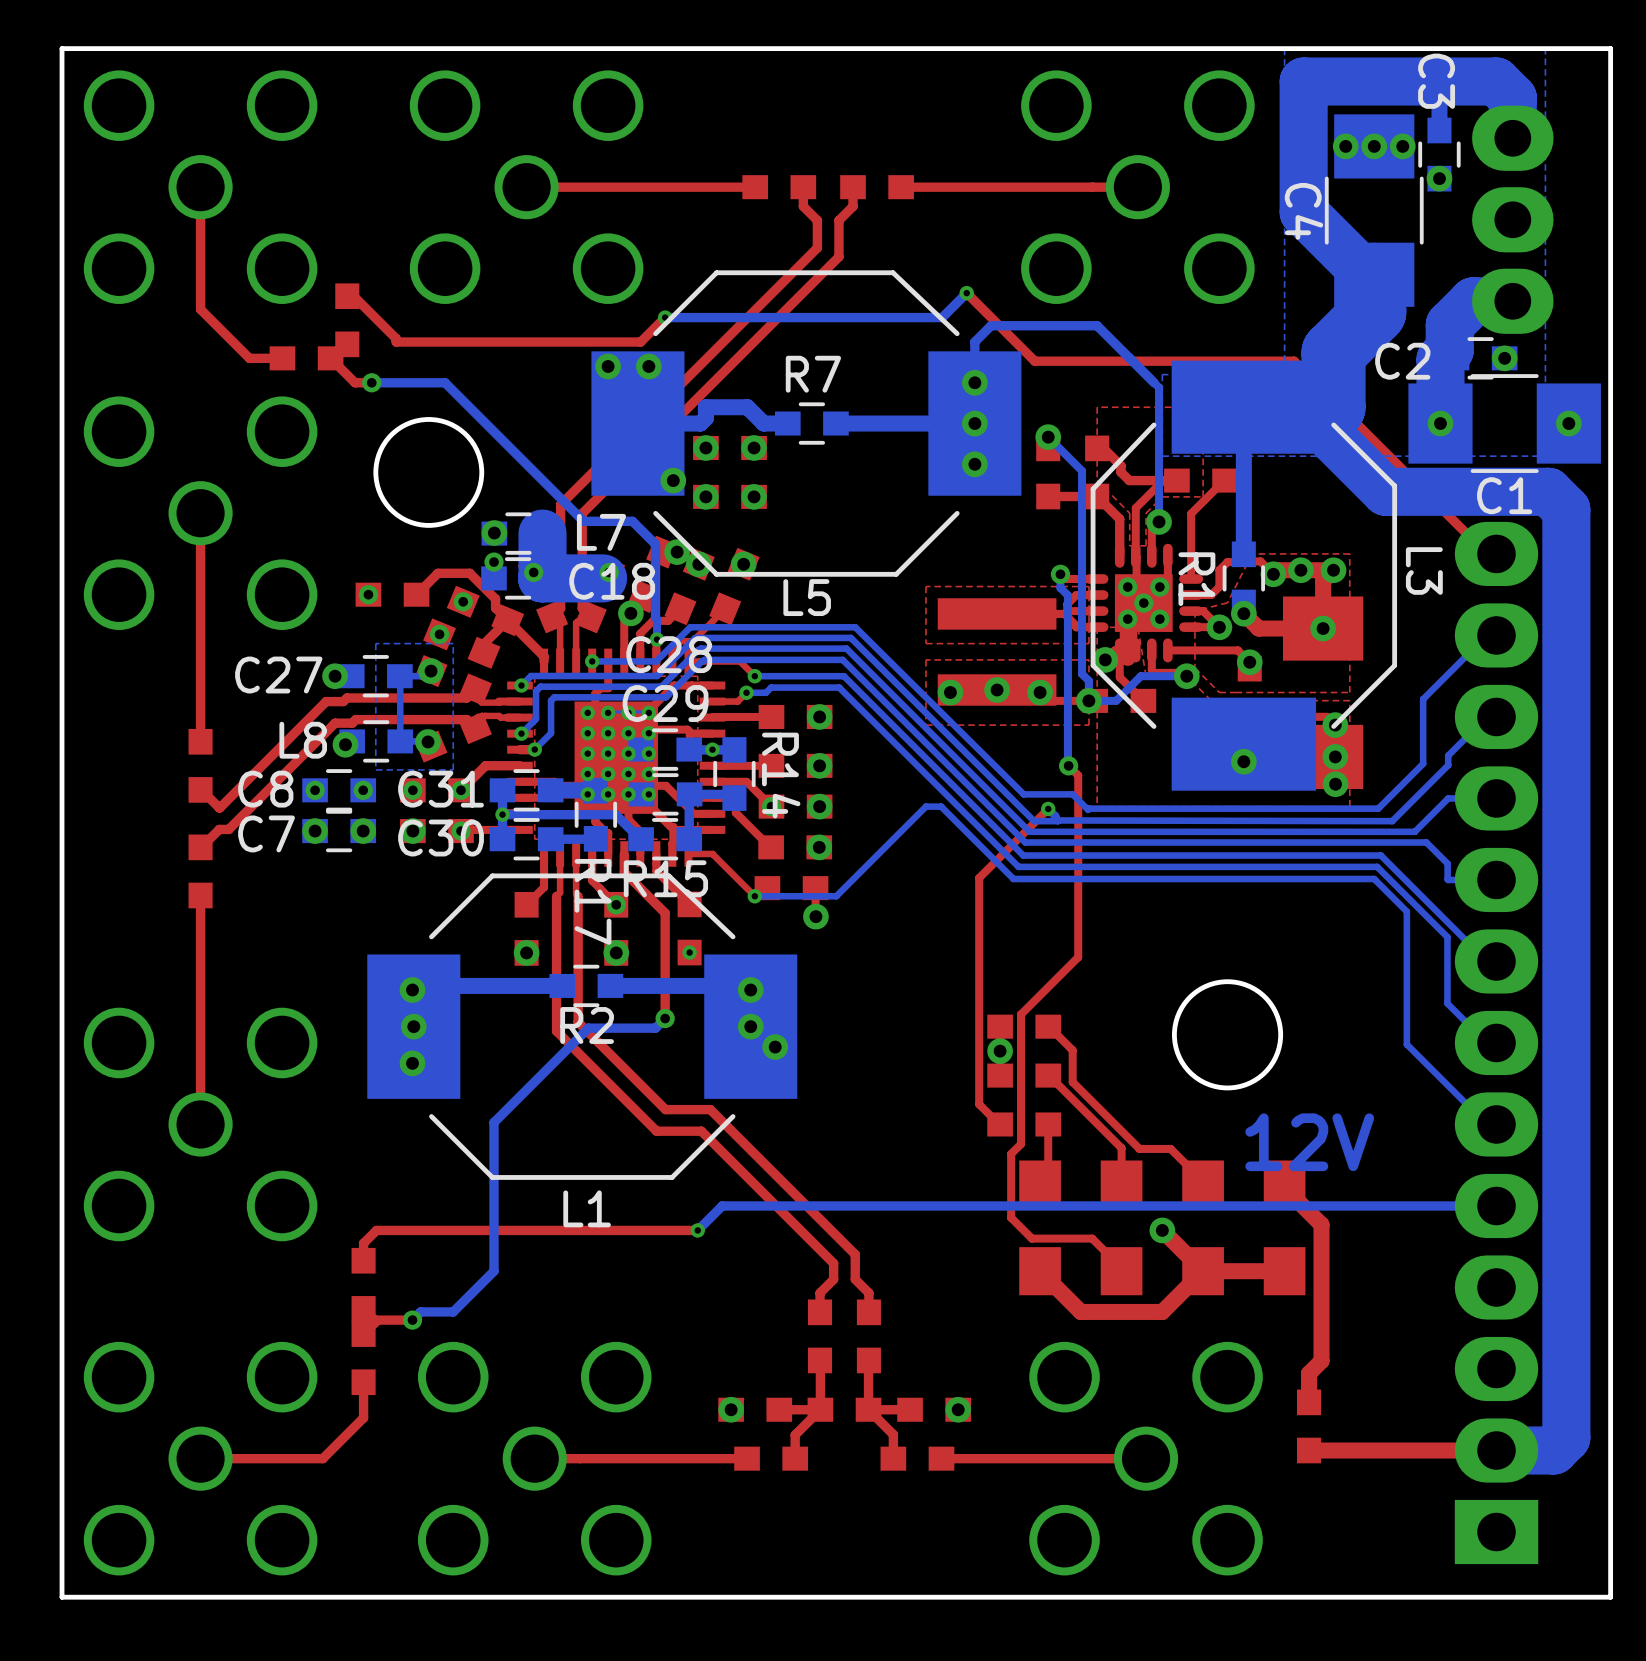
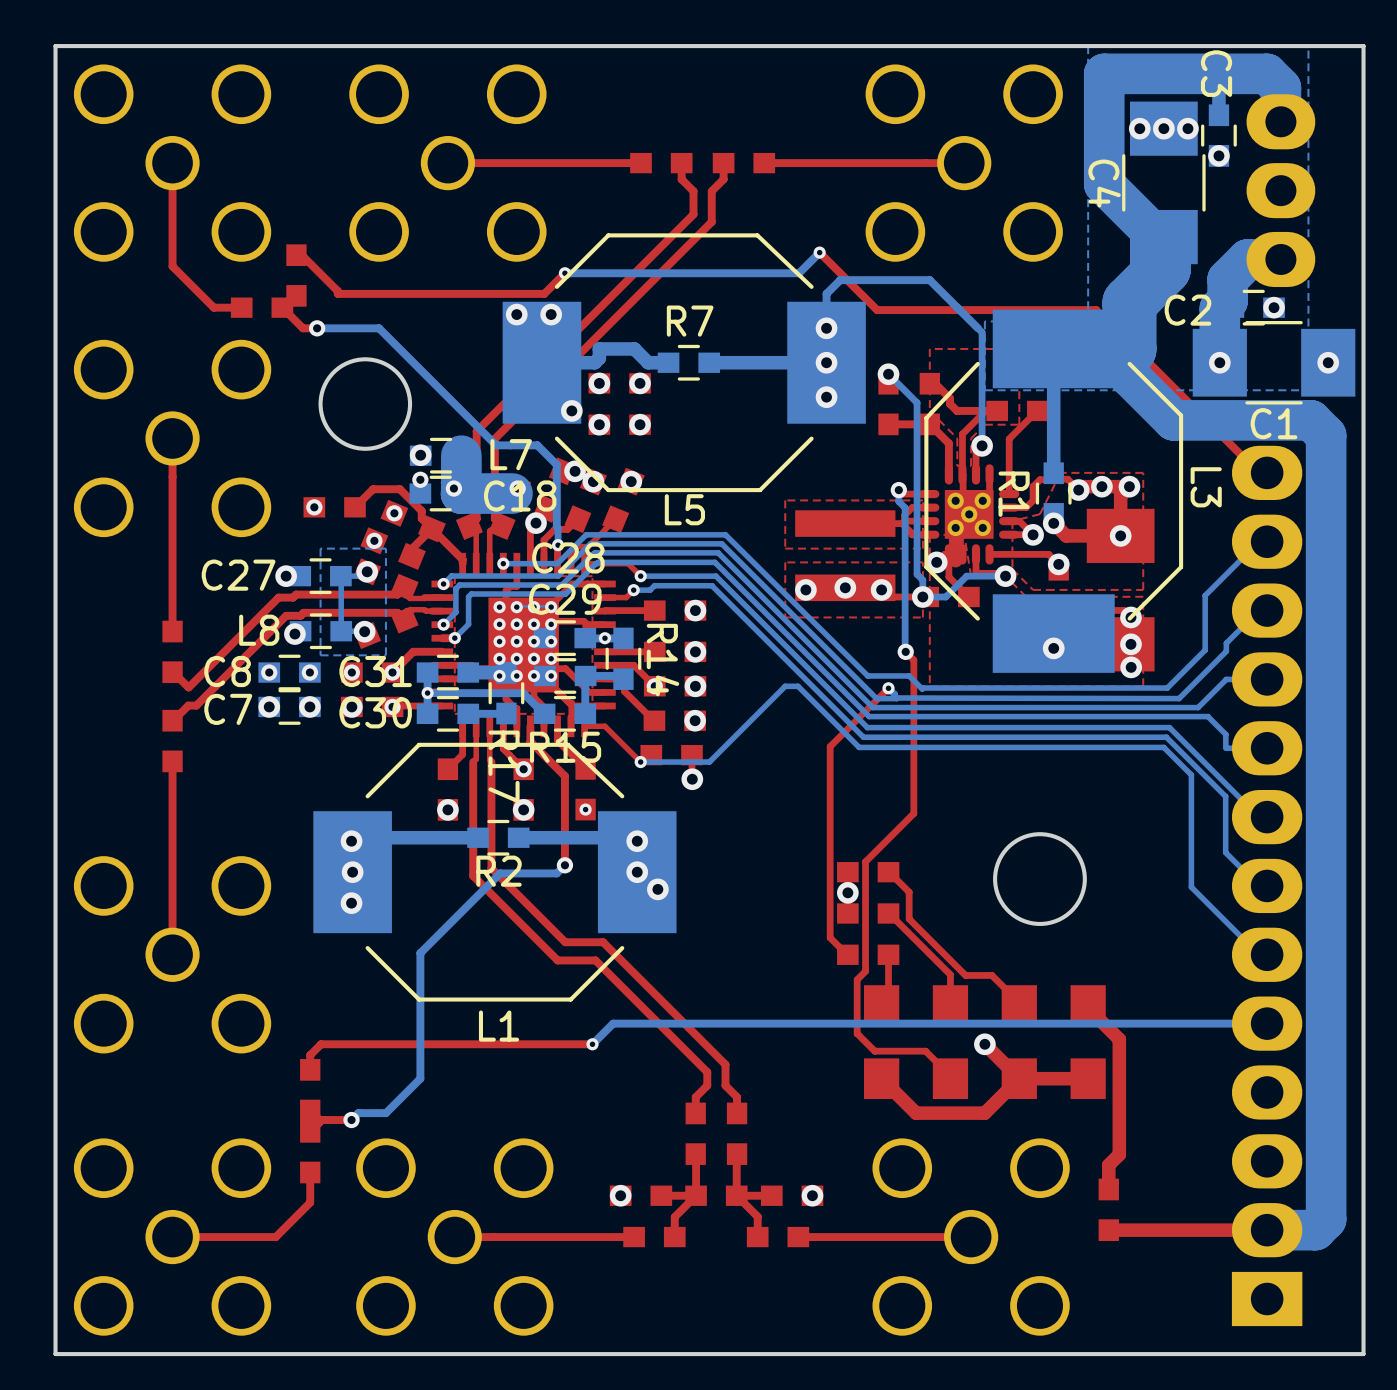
text: 12V (1309, 1142) -> none

